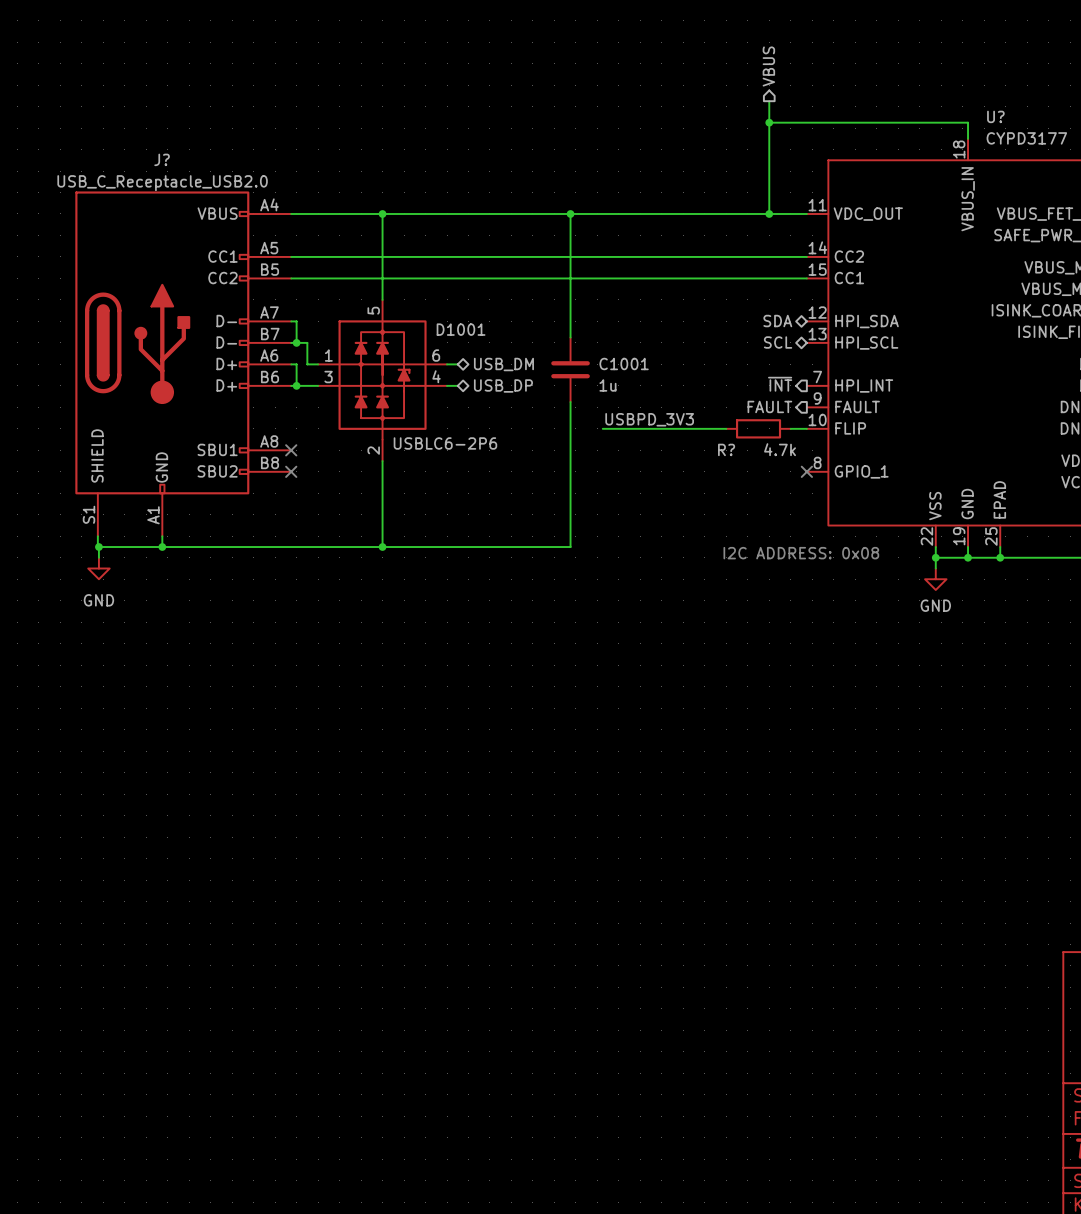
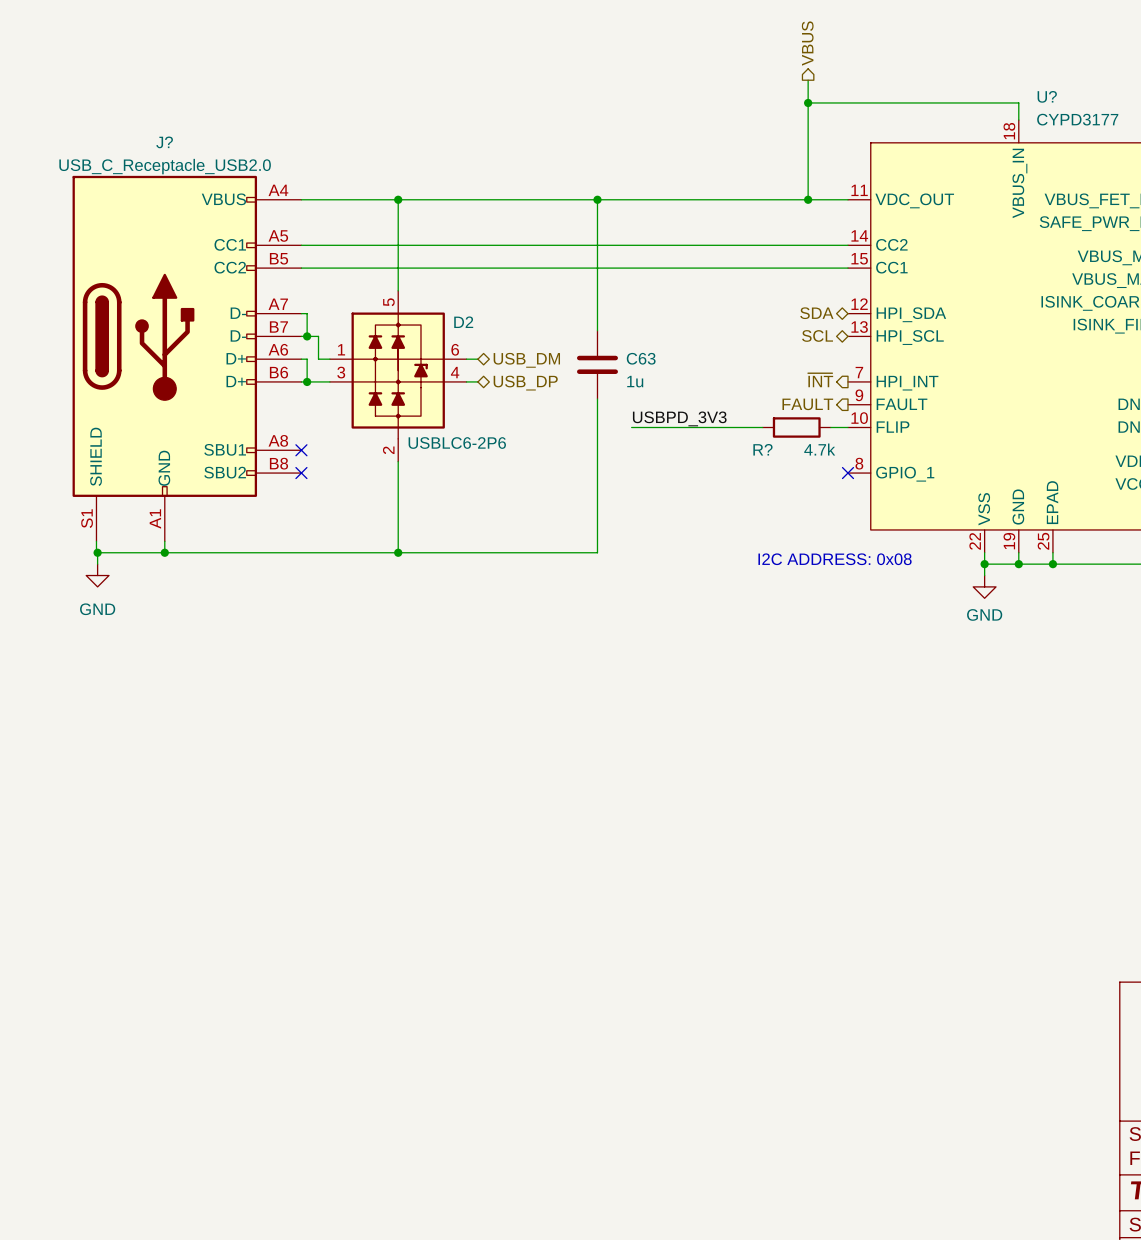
D1001 name: D1001 (461, 329) -> D2 (463, 322)
C1001 name: C1001 (624, 363) -> C63 (641, 358)

